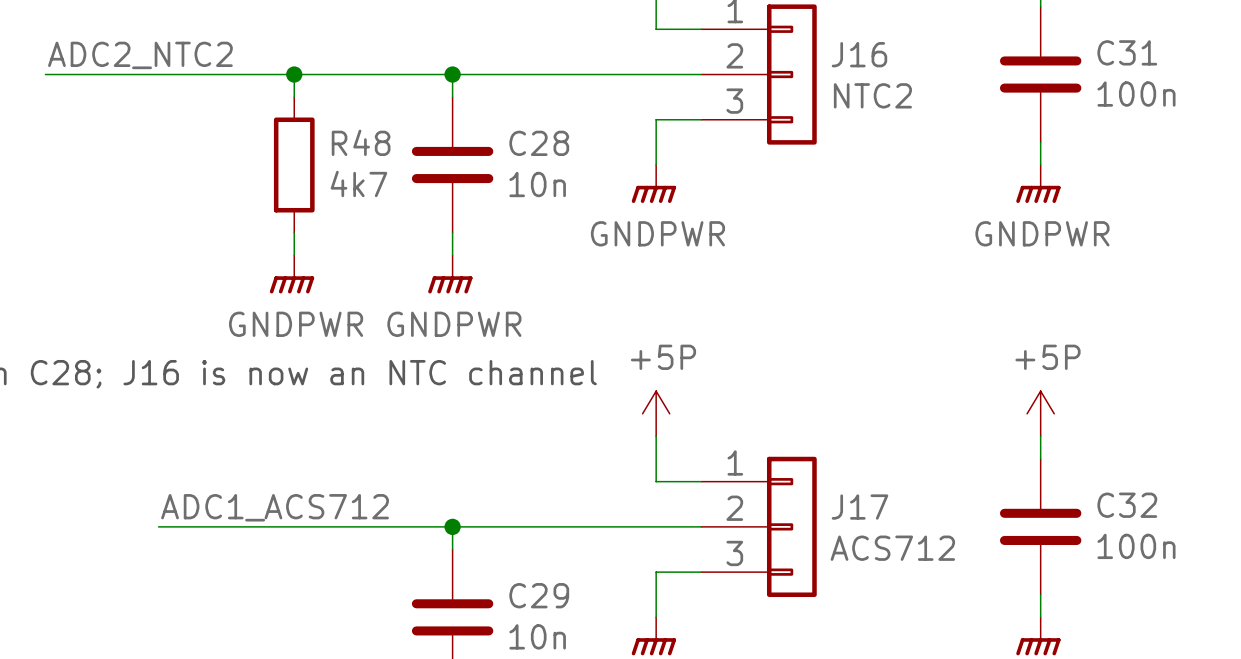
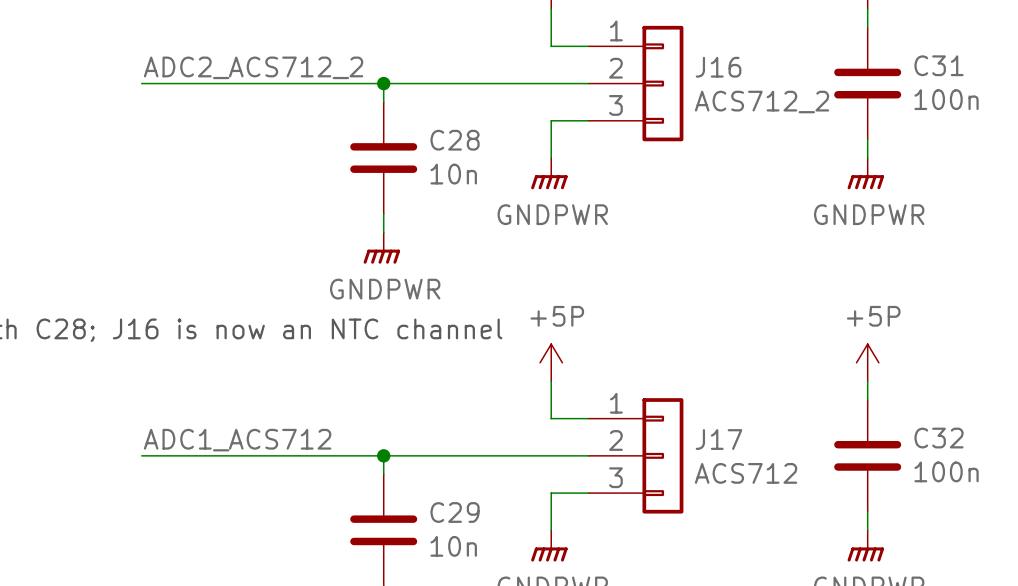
label: ADC2_NTC2 (140, 55) -> ADC2_ACS712_2 (253, 67)
wire: (45, 74) (158, 74) -> none
wire: (294, 74) (294, 97) -> none
junction: (294, 74) -> none
J16 value: NTC2 (872, 95) -> ACS712_2 (761, 102)
R48: 4k7 (294, 165) -> none
wire: (294, 232) (294, 255) -> none
power symbol: GNDPWR (292, 274) -> none

